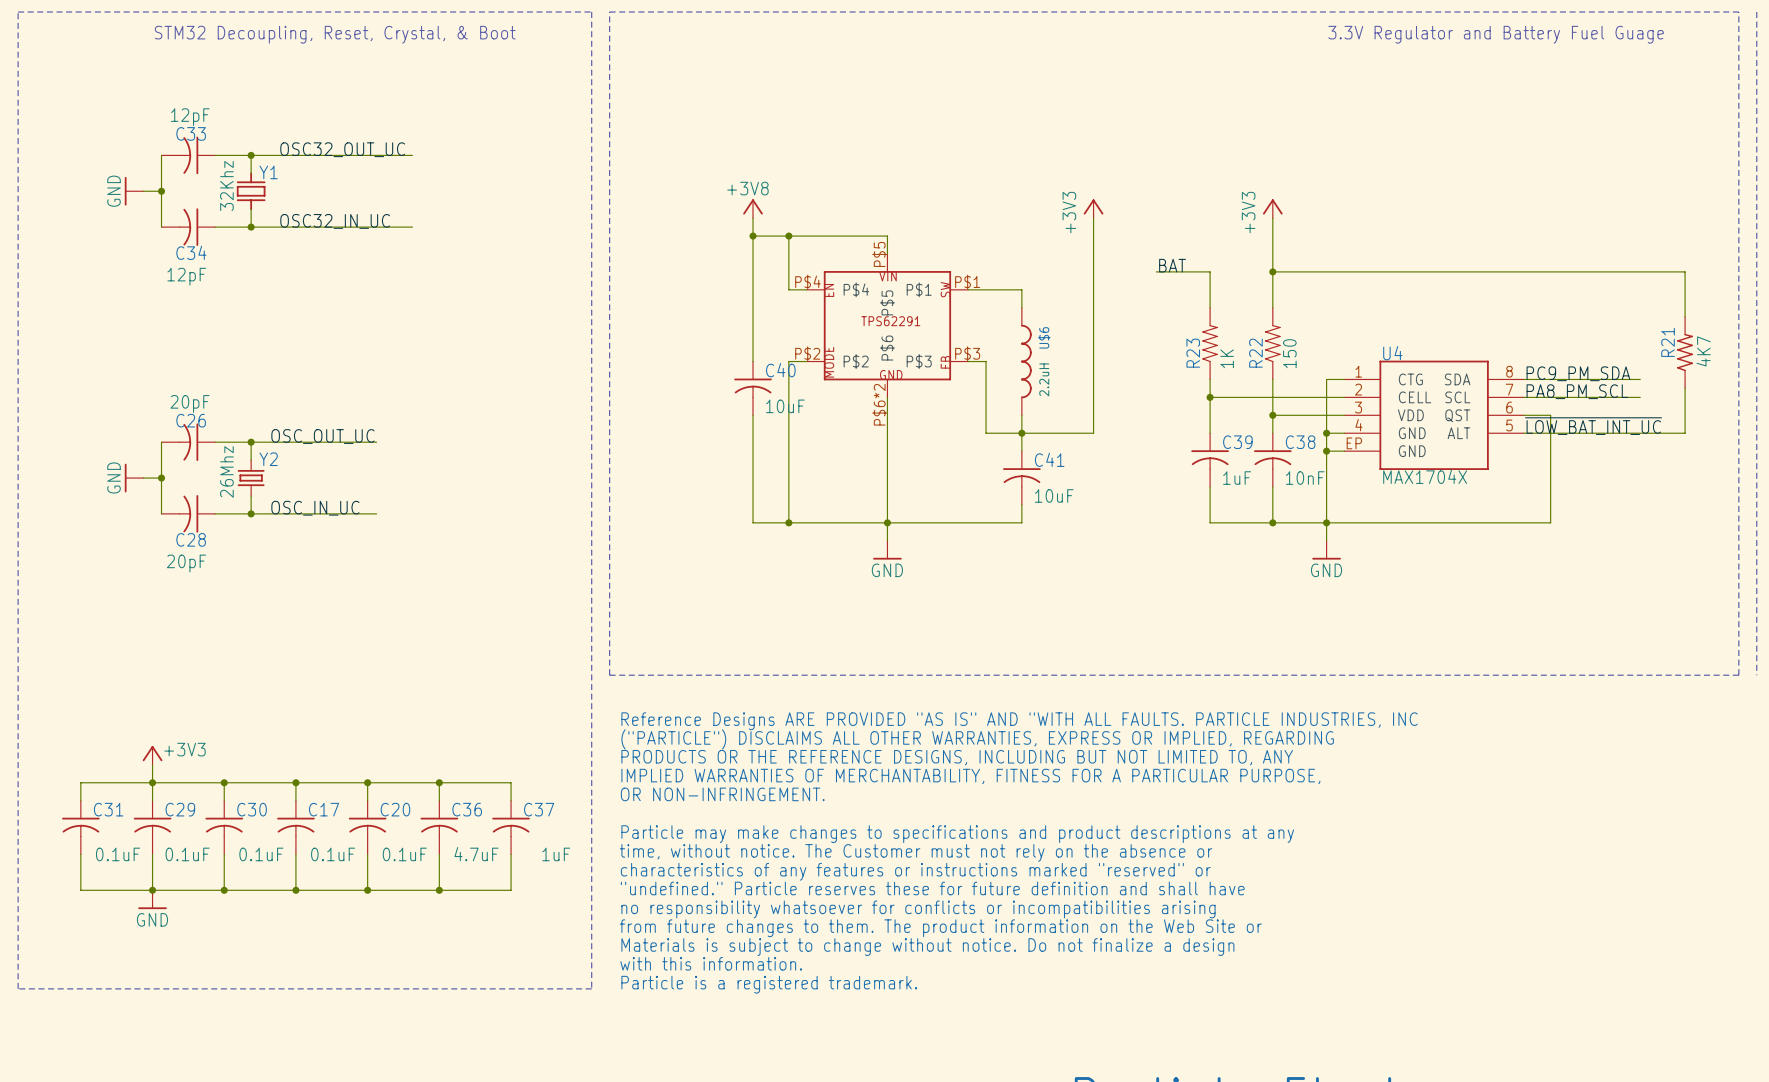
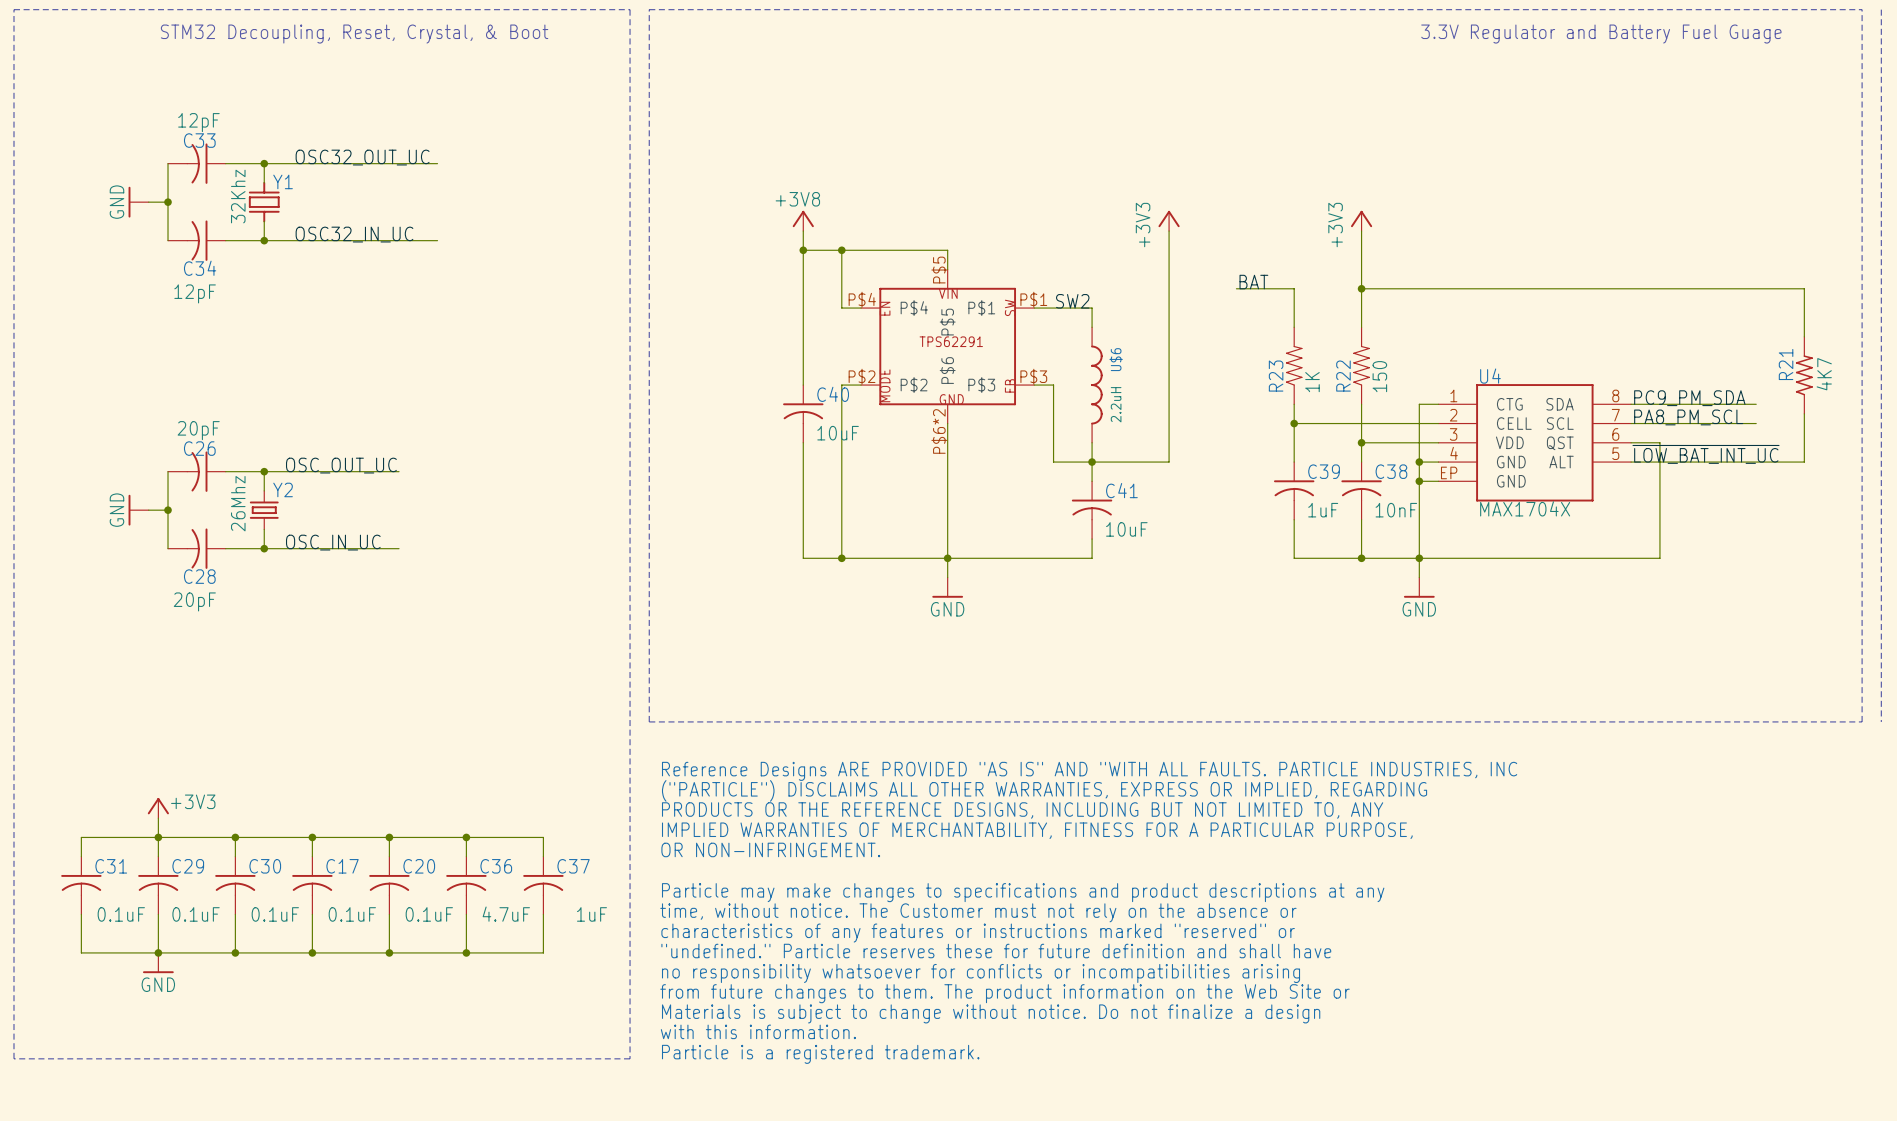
label: none -> SW2 (1072, 301)

